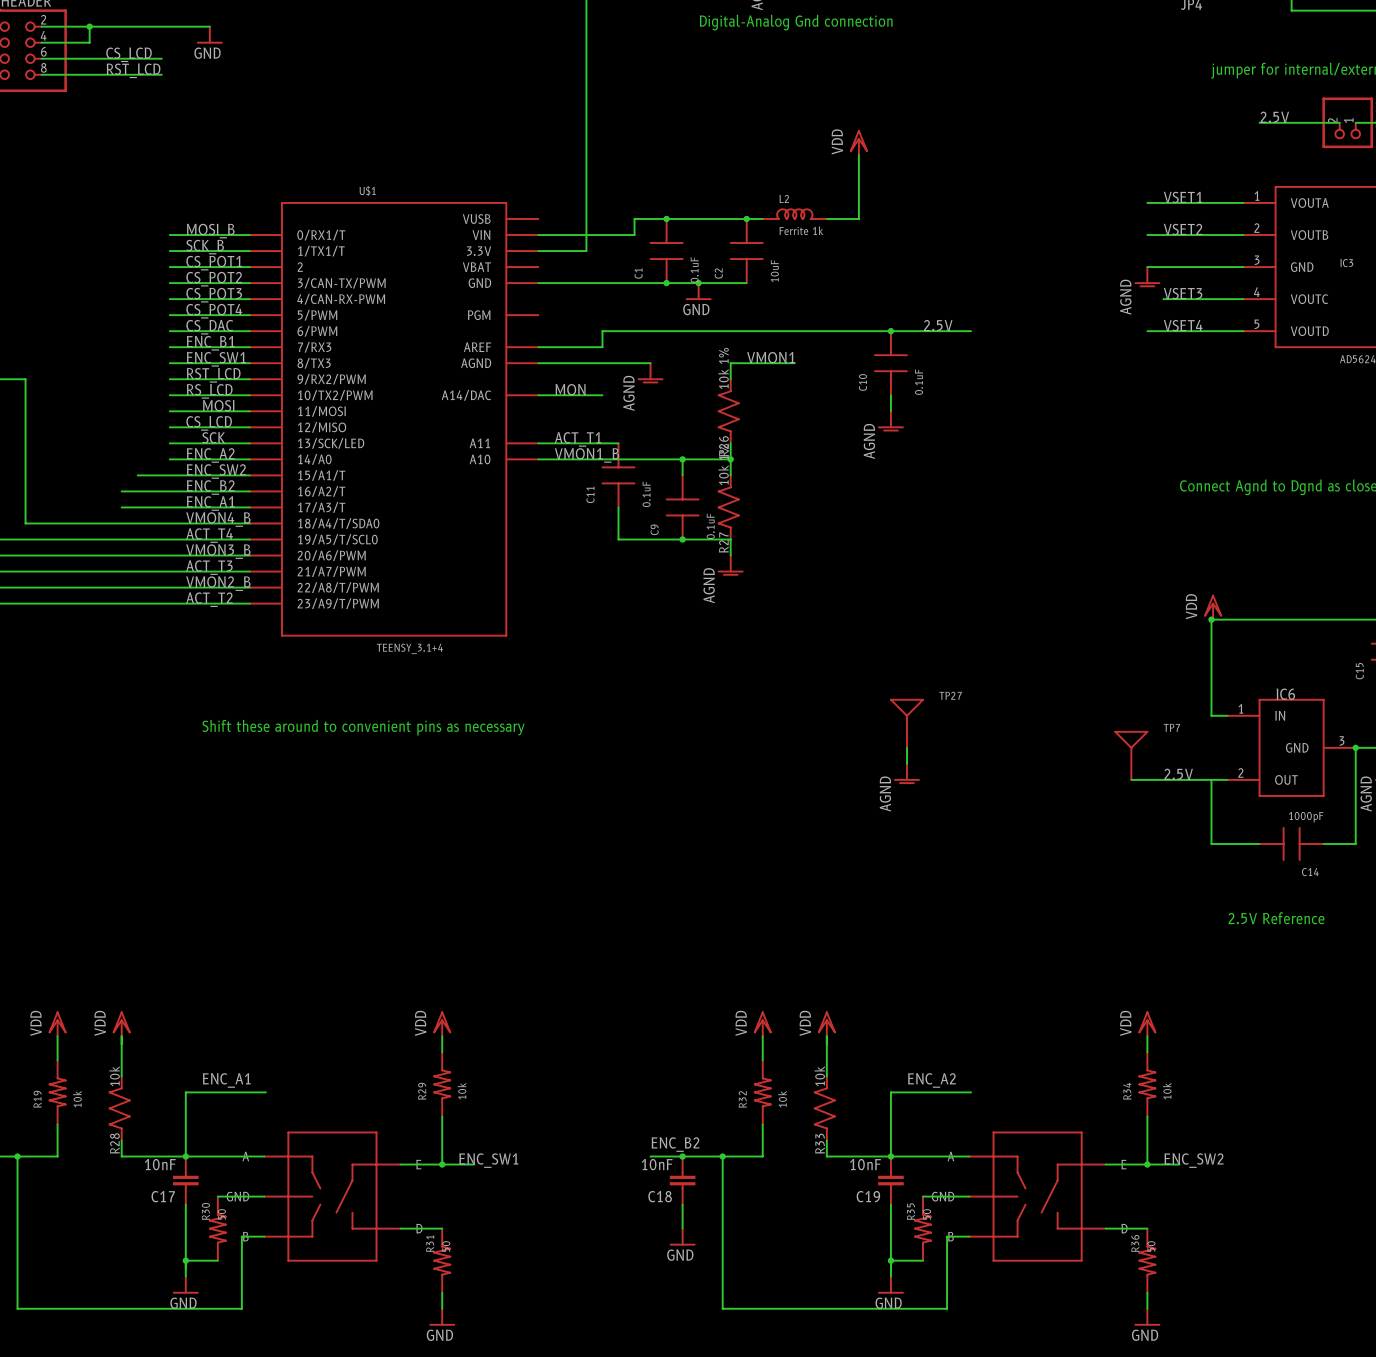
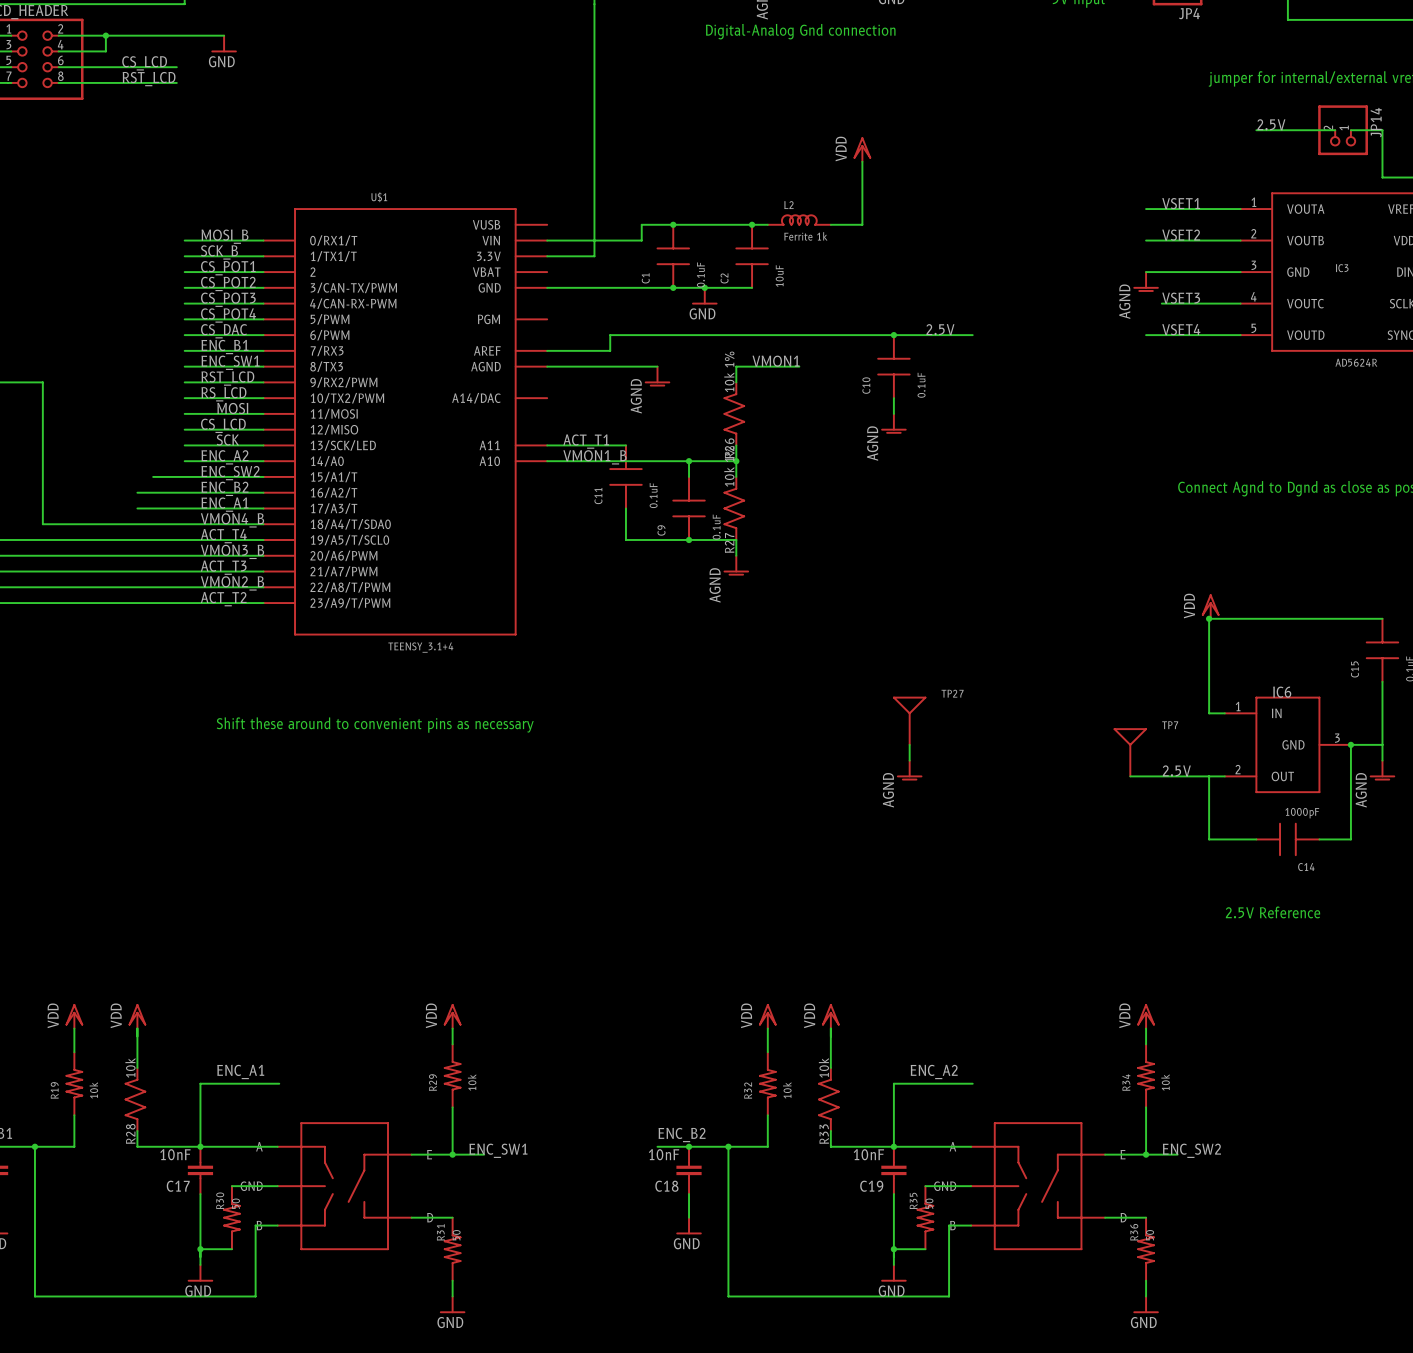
label: MON (570, 389) -> none
wire: (538, 395) (602, 395) -> none

